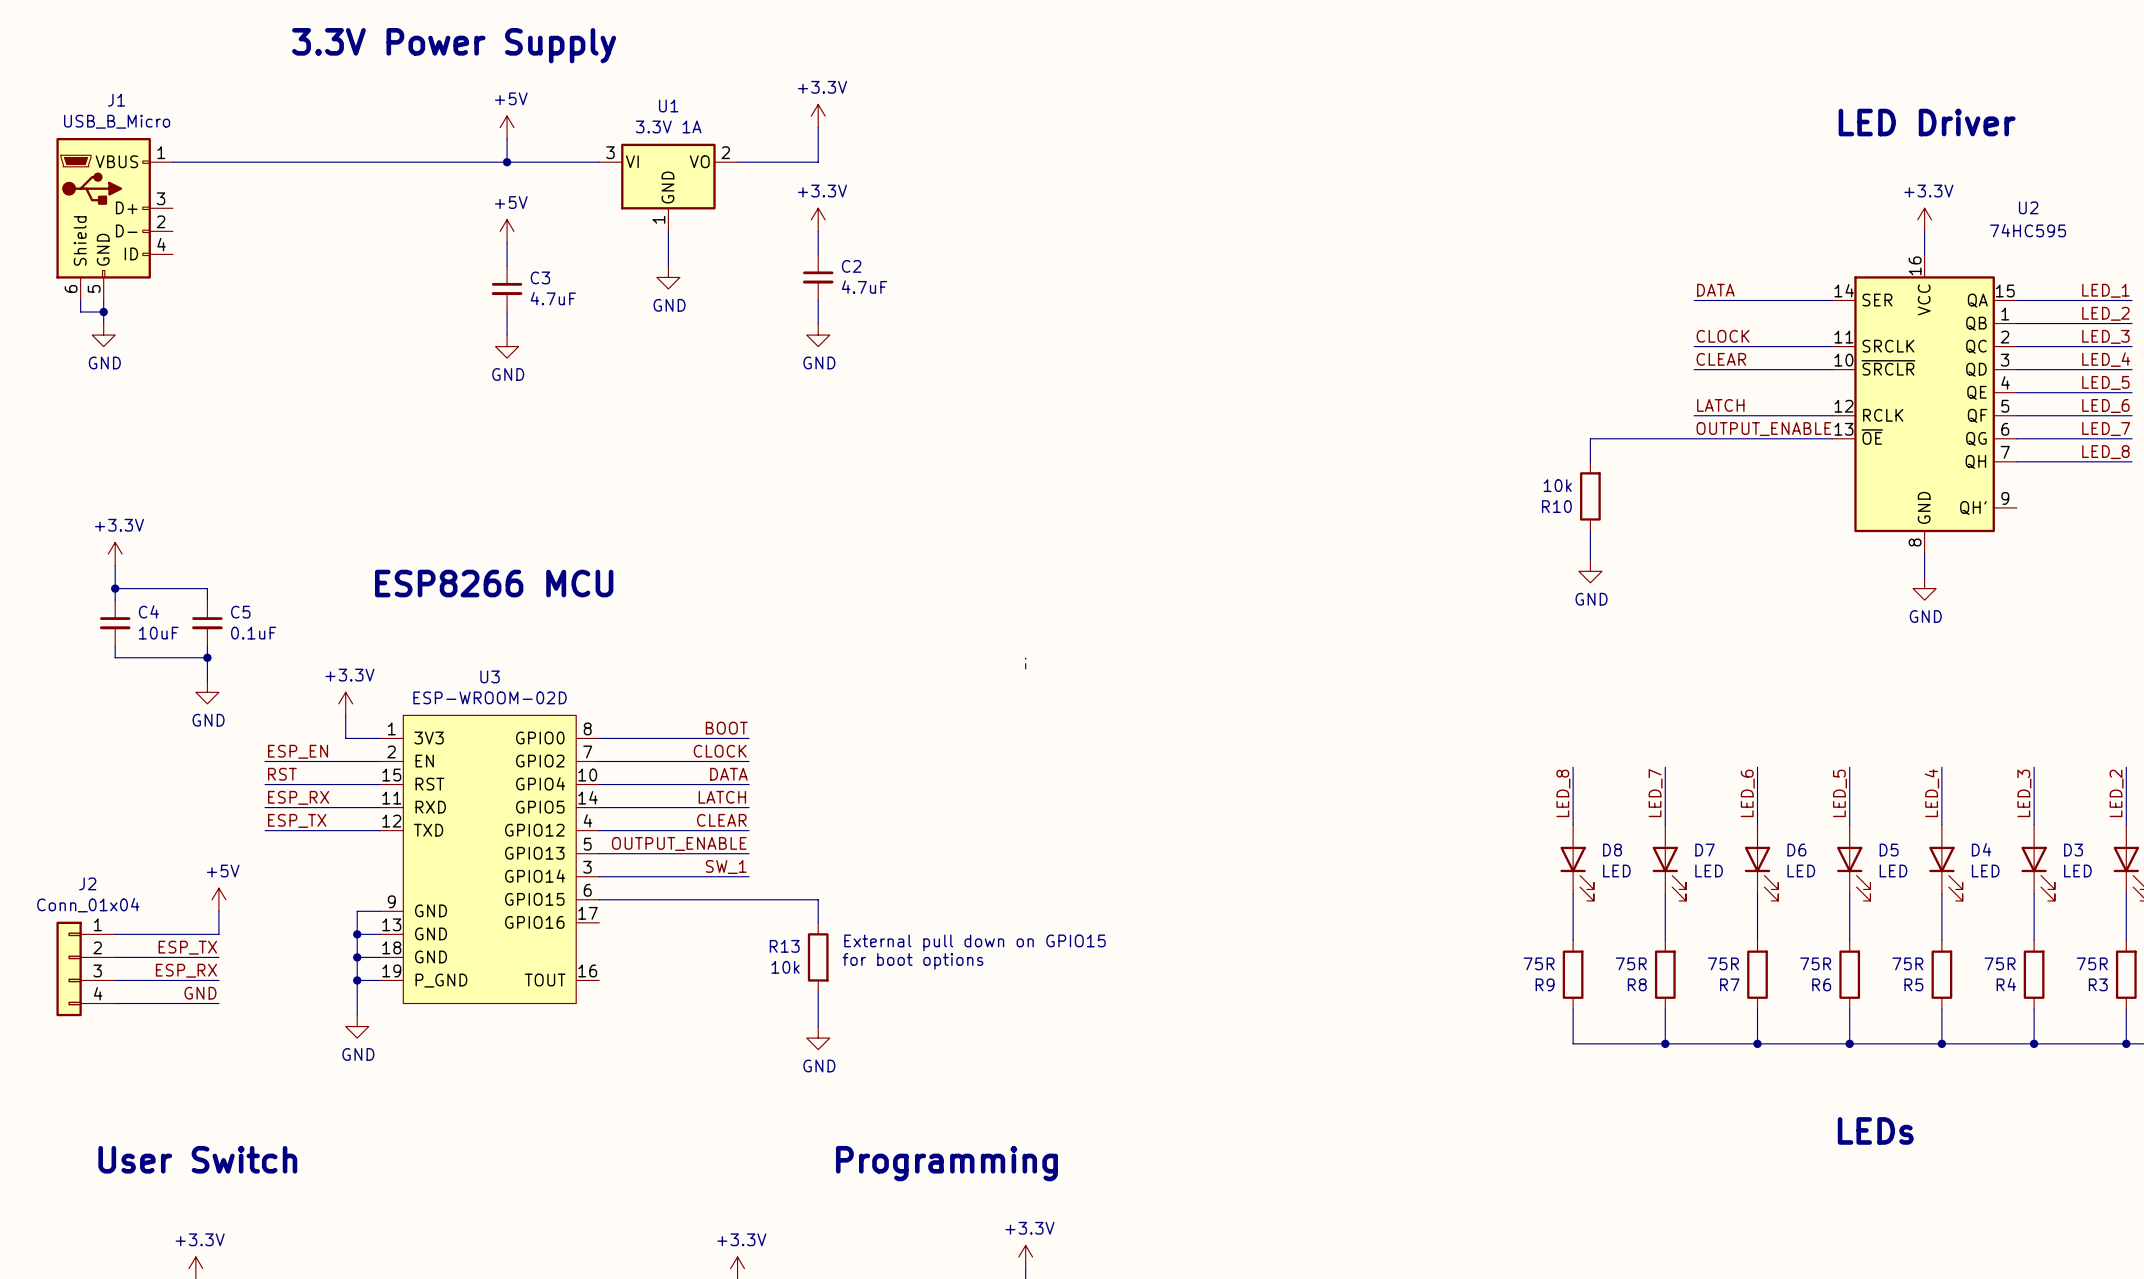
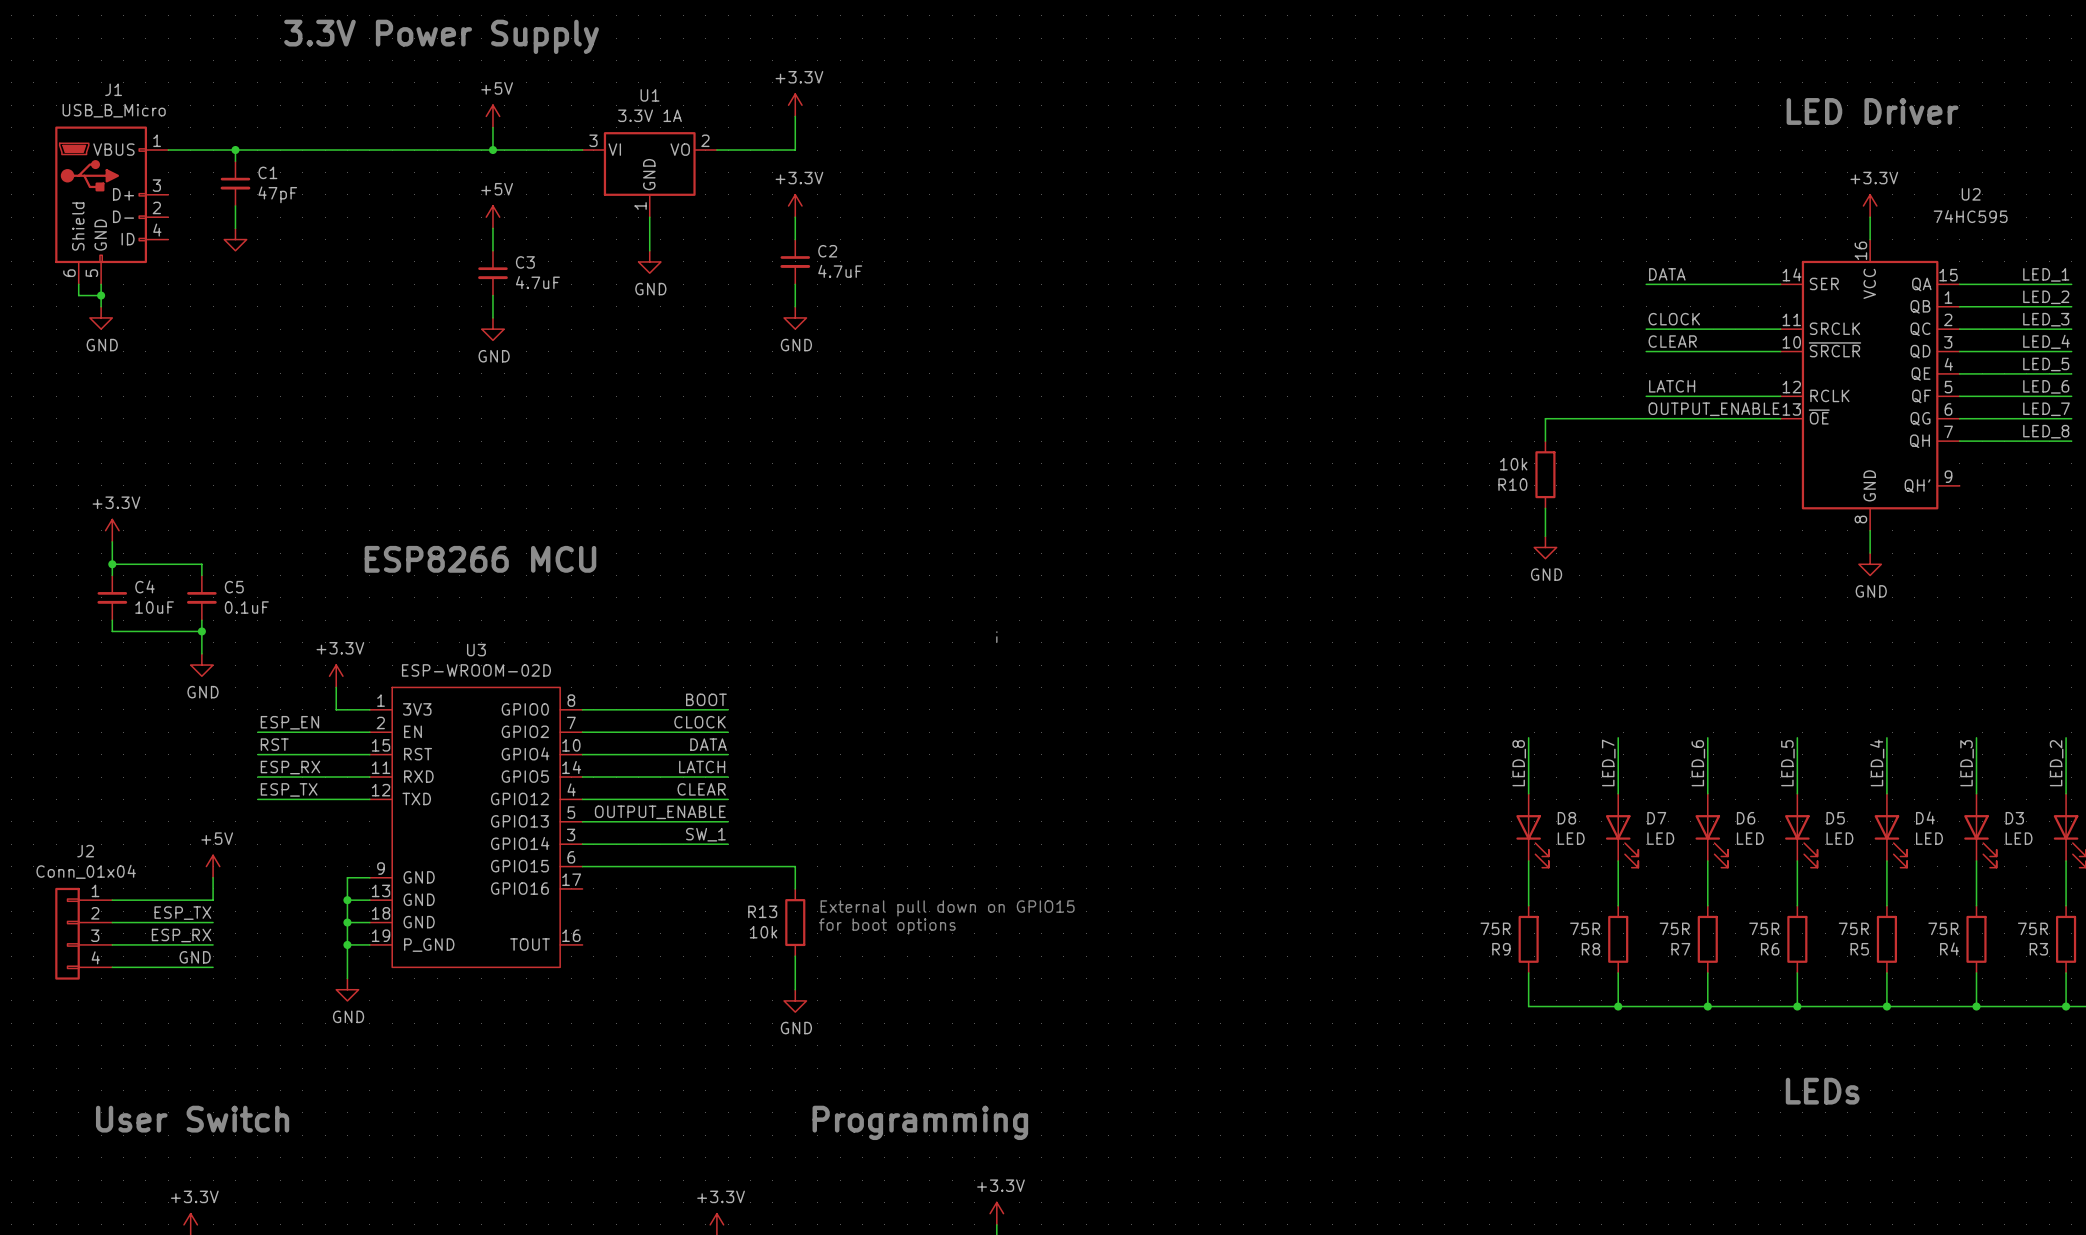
wire: none -> (235, 150) (235, 161)
junction: none -> (235, 150)
C1: none -> 47pF (235, 183)
wire: none -> (235, 205) (235, 228)
power symbol: none -> (235, 239)

